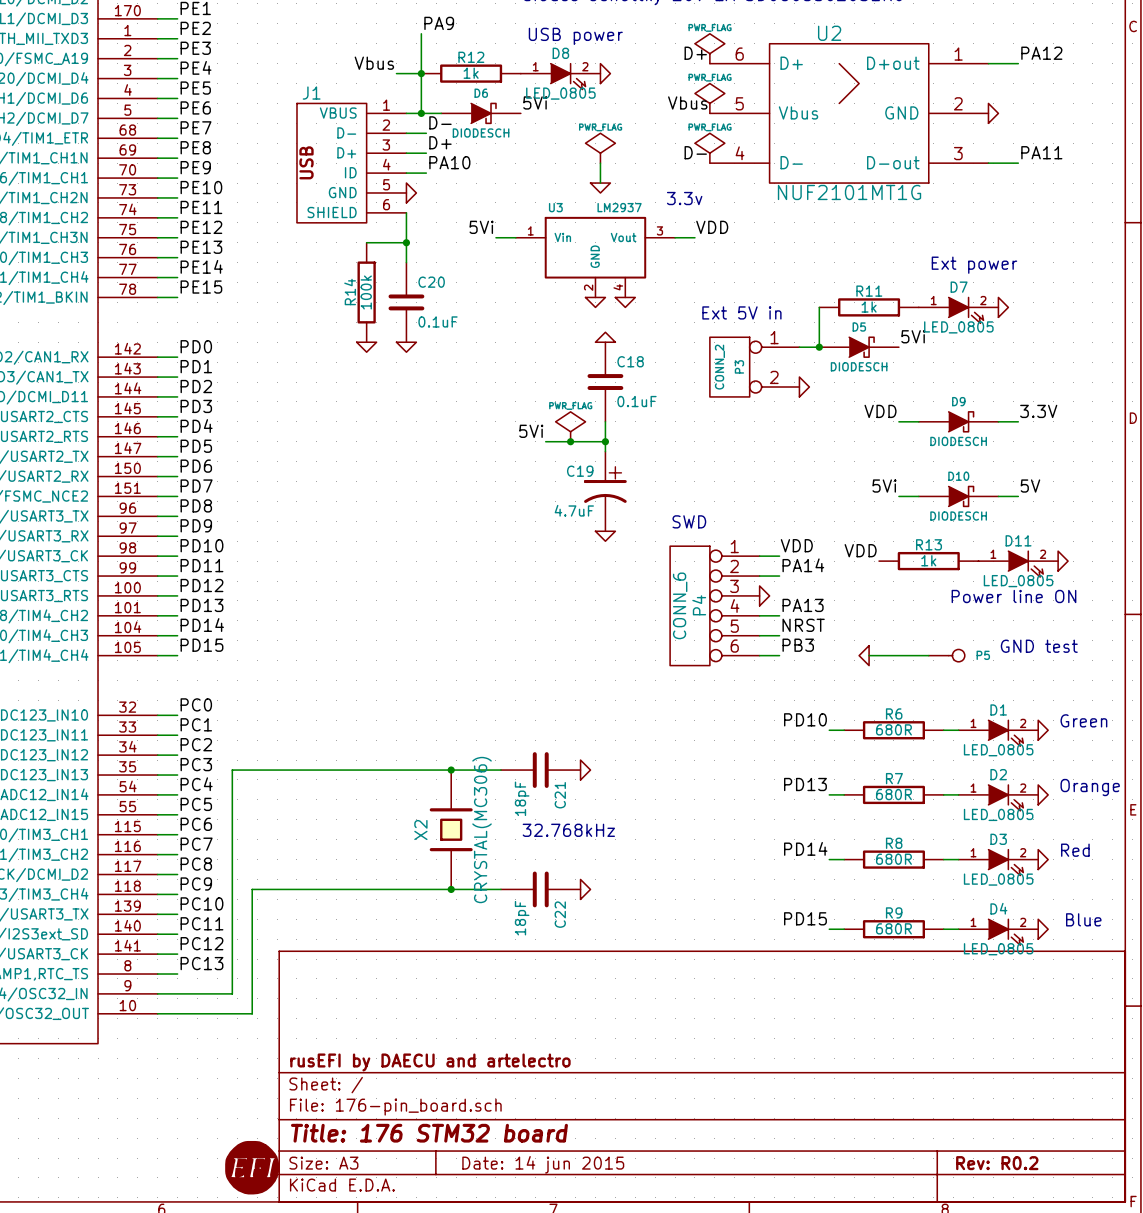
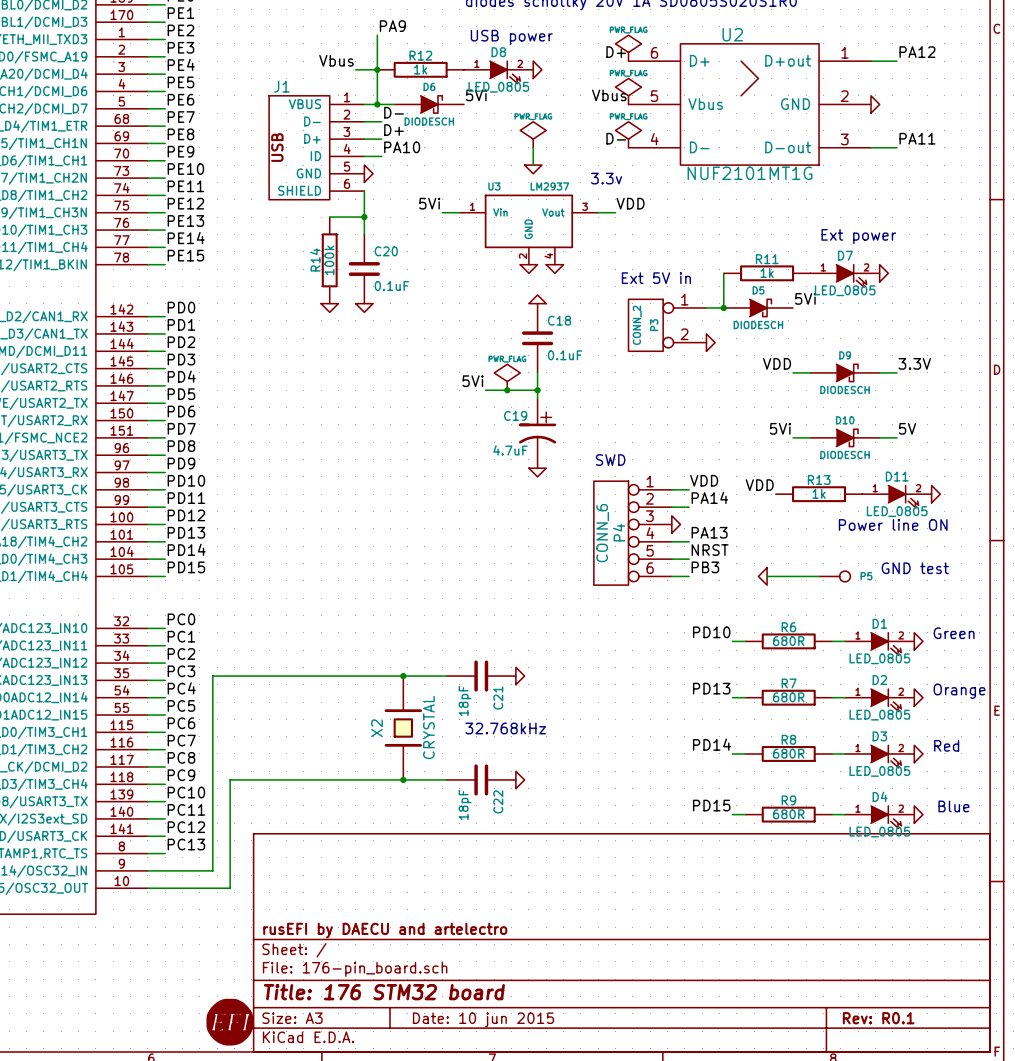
X2 value: CRYSTAL(MC306) (482, 830) -> CRYSTAL (428, 727)
title block: Rev: R0.2 (997, 1163) -> Rev: R0.1 (878, 1018)
title block: Date: 14 jun 2015 (543, 1164) -> Date: 10 jun 2015 (483, 1019)

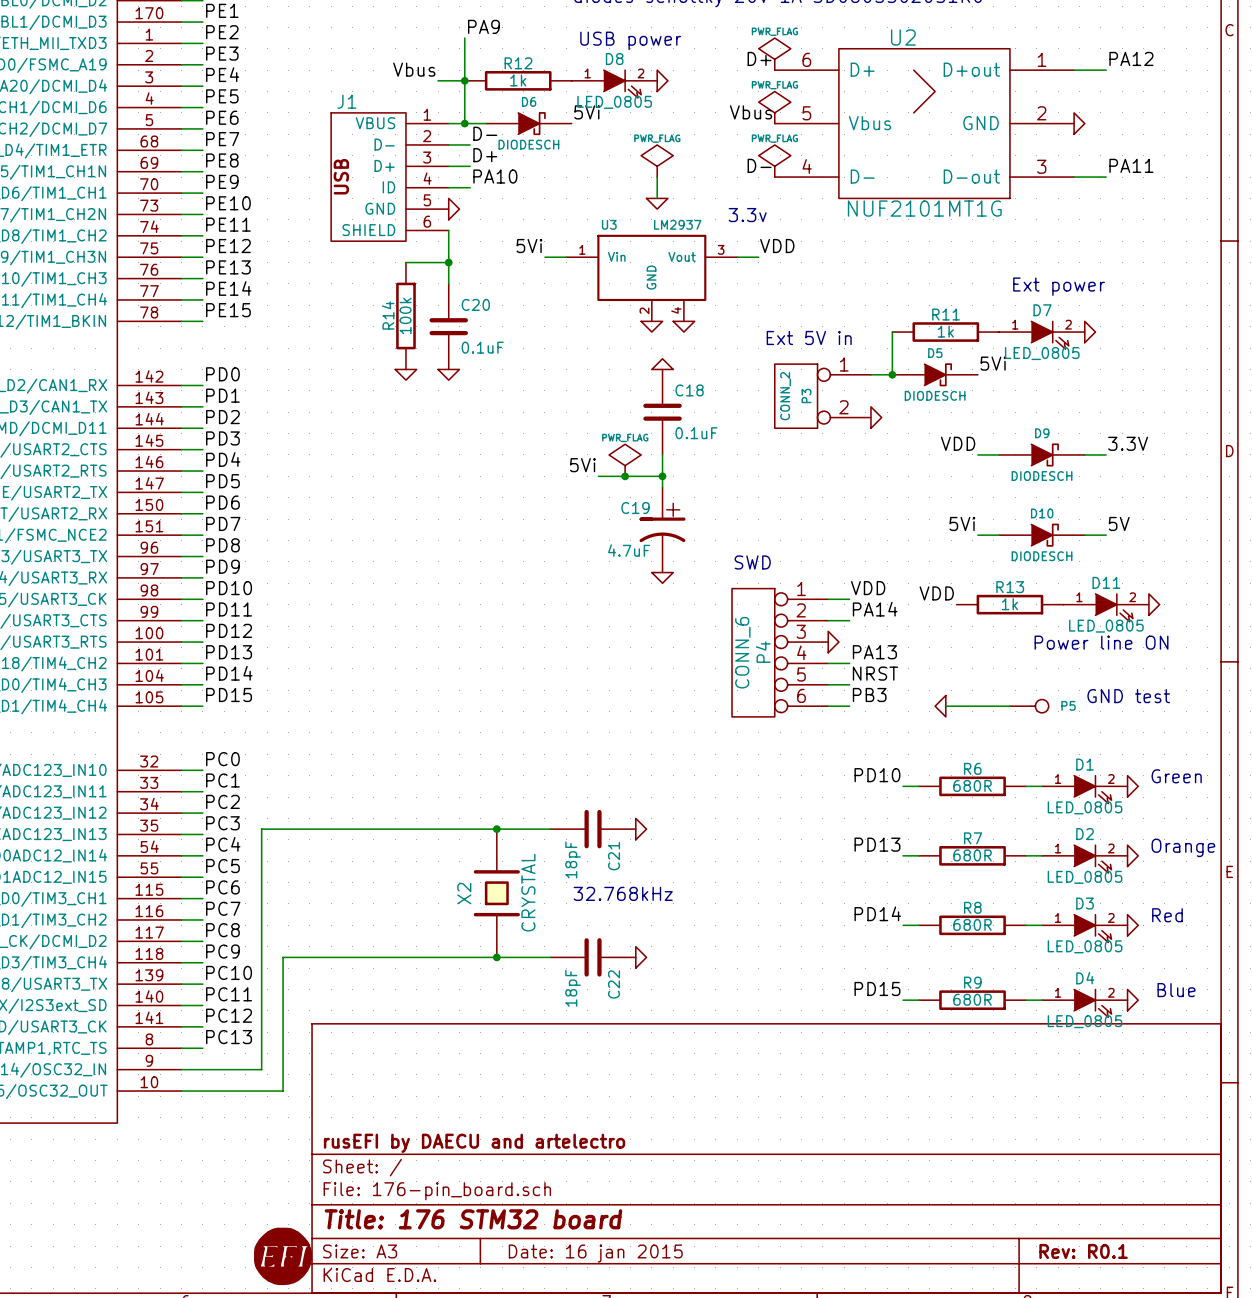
title block: Date: 10 jun 2015 (483, 1019) -> Date: 16 jan 2015 (595, 1253)

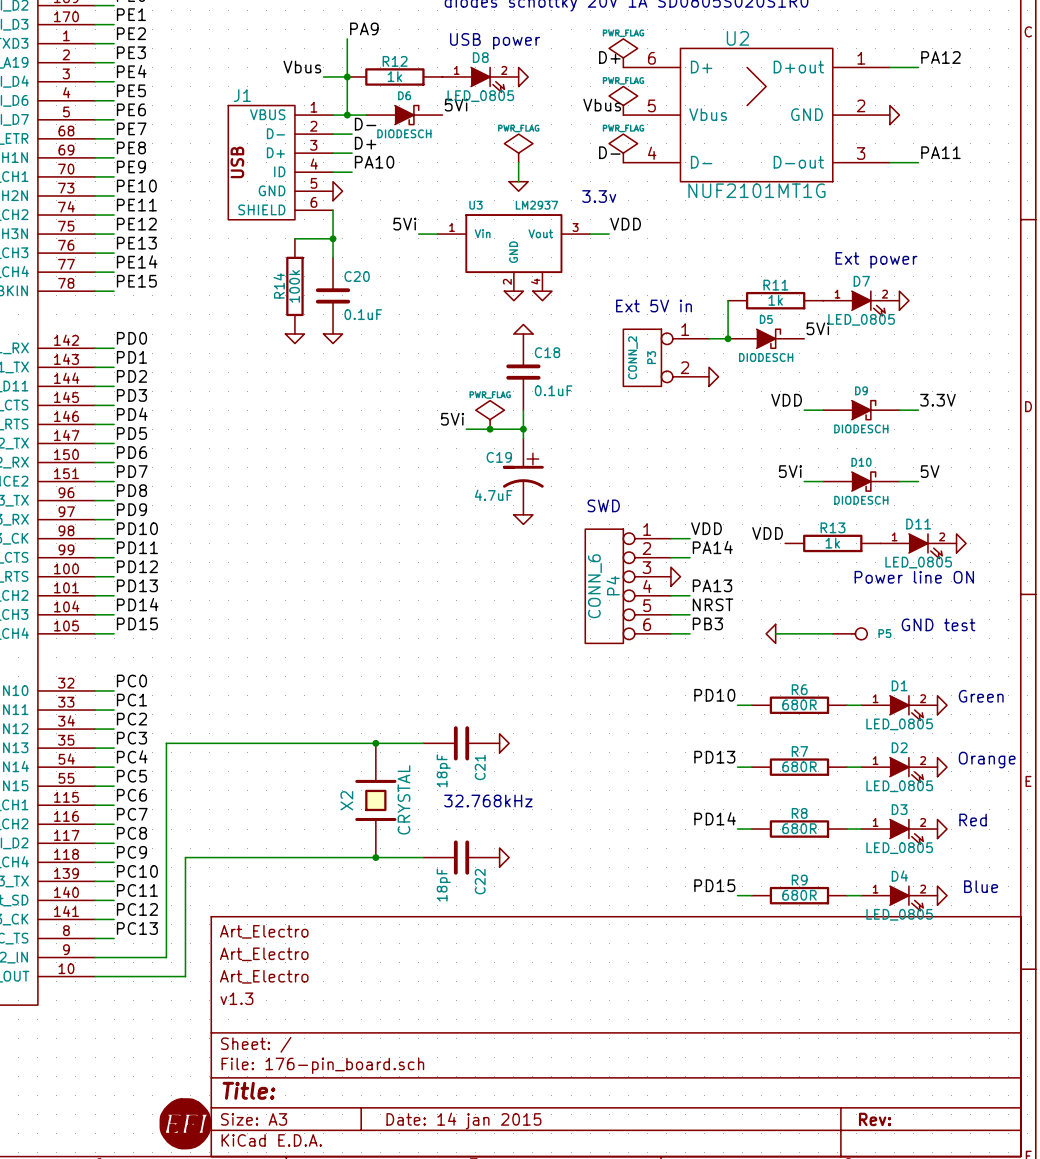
title block: none -> Art_Electro (264, 931)
title block: none -> Art_Electro (264, 954)
title block: none -> Art_Electro (264, 976)
title block: none -> v1.3 (236, 998)
title block: rusEFI by DAECU and artelectro (474, 1143) -> none
title block: Title: 176 STM32 board (473, 1219) -> Title: (248, 1090)
title block: Rev: R0.1 (1083, 1251) -> Rev: (875, 1119)
title block: Date: 16 jan 2015 (595, 1253) -> Date: 14 jan 2015 (463, 1121)

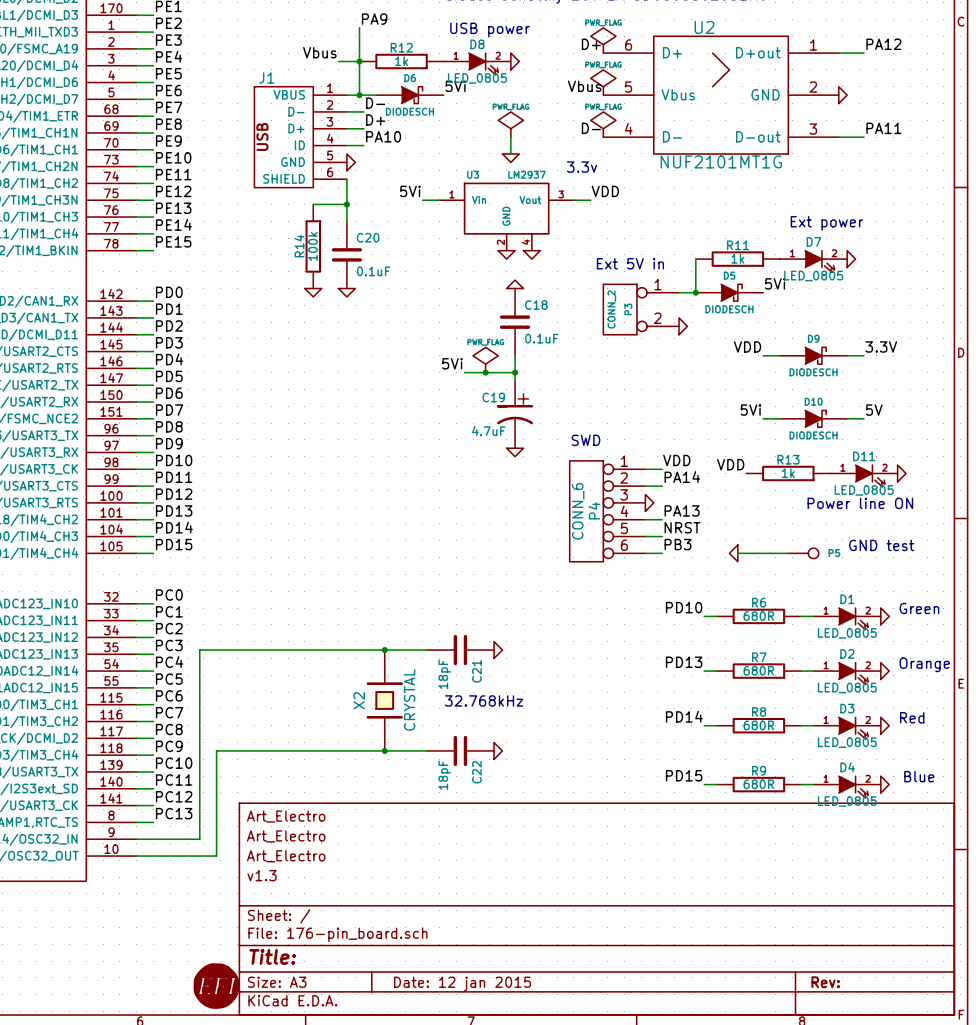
title block: Date: 14 jan 2015 (463, 1121) -> Date: 12 jan 2015 (462, 983)

